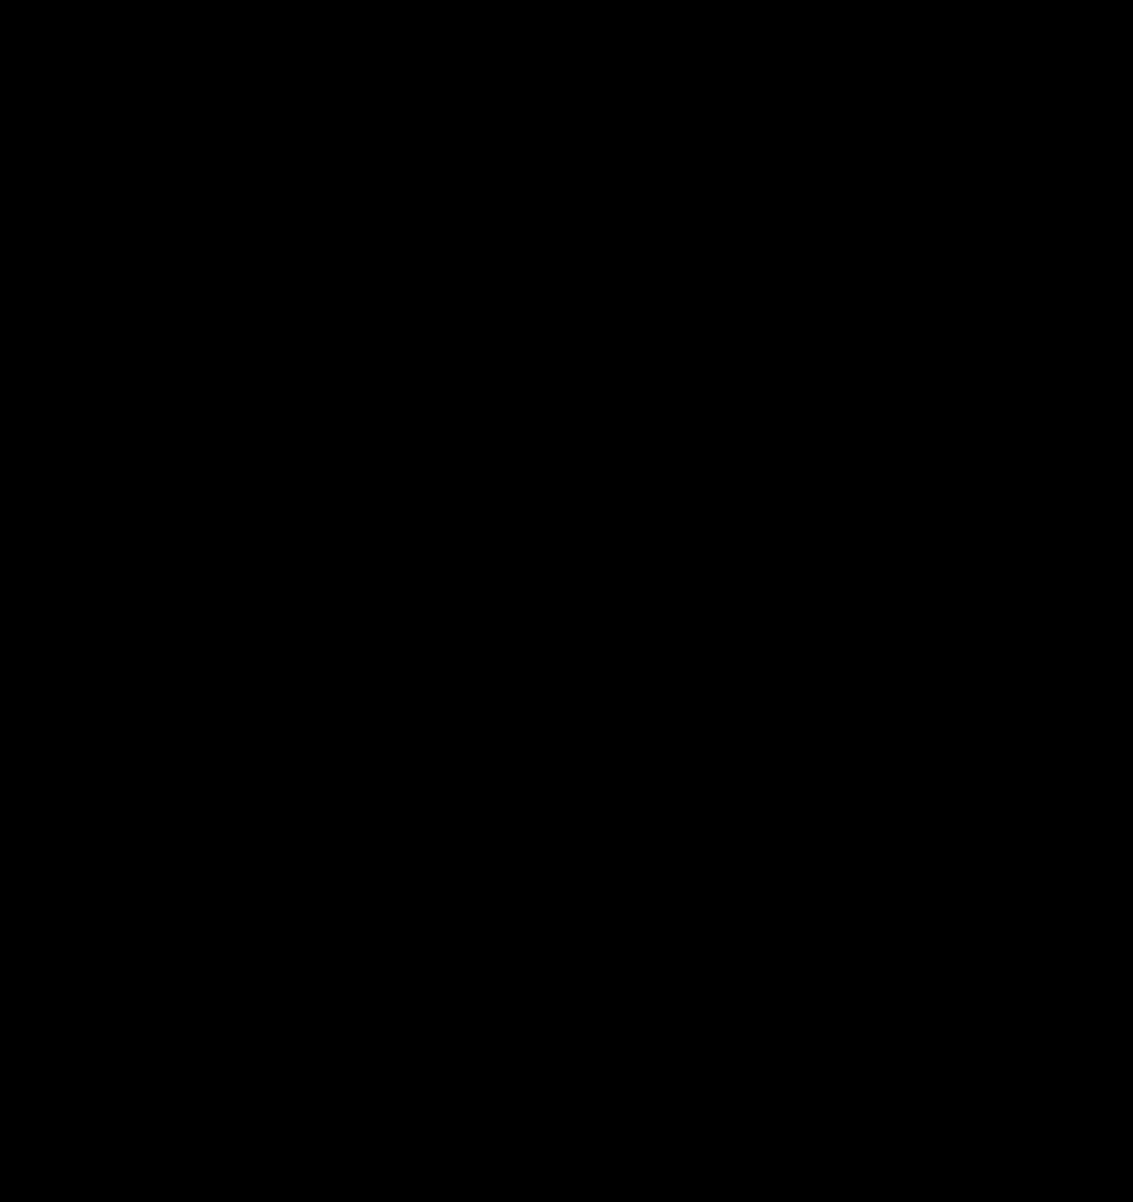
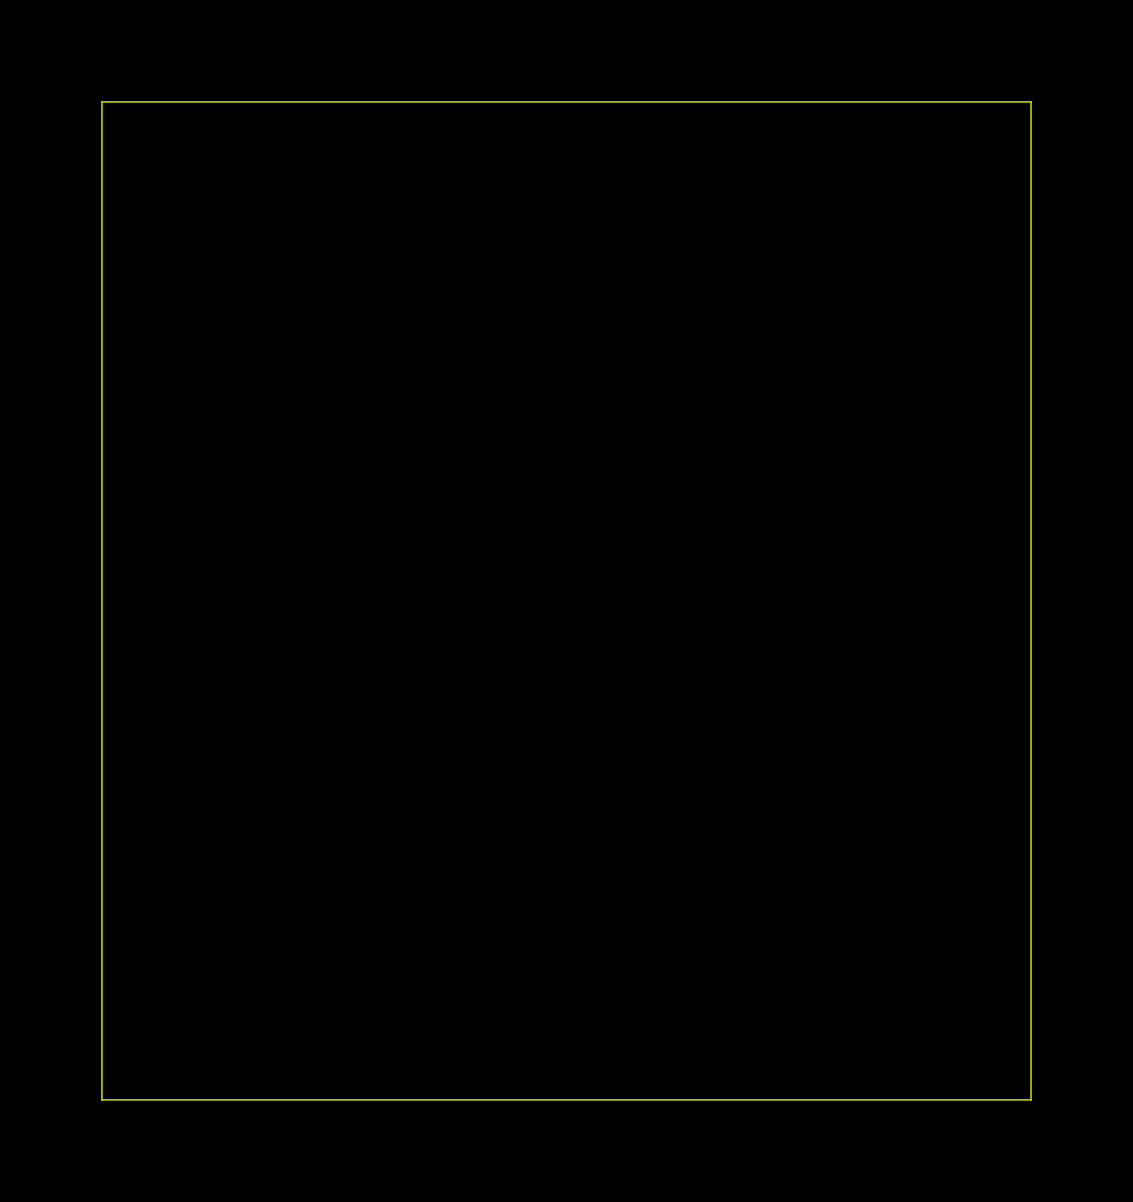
board edge: none -> (1031, 101) (101, 101) (101, 1099) (1031, 1099) (1031, 101)

